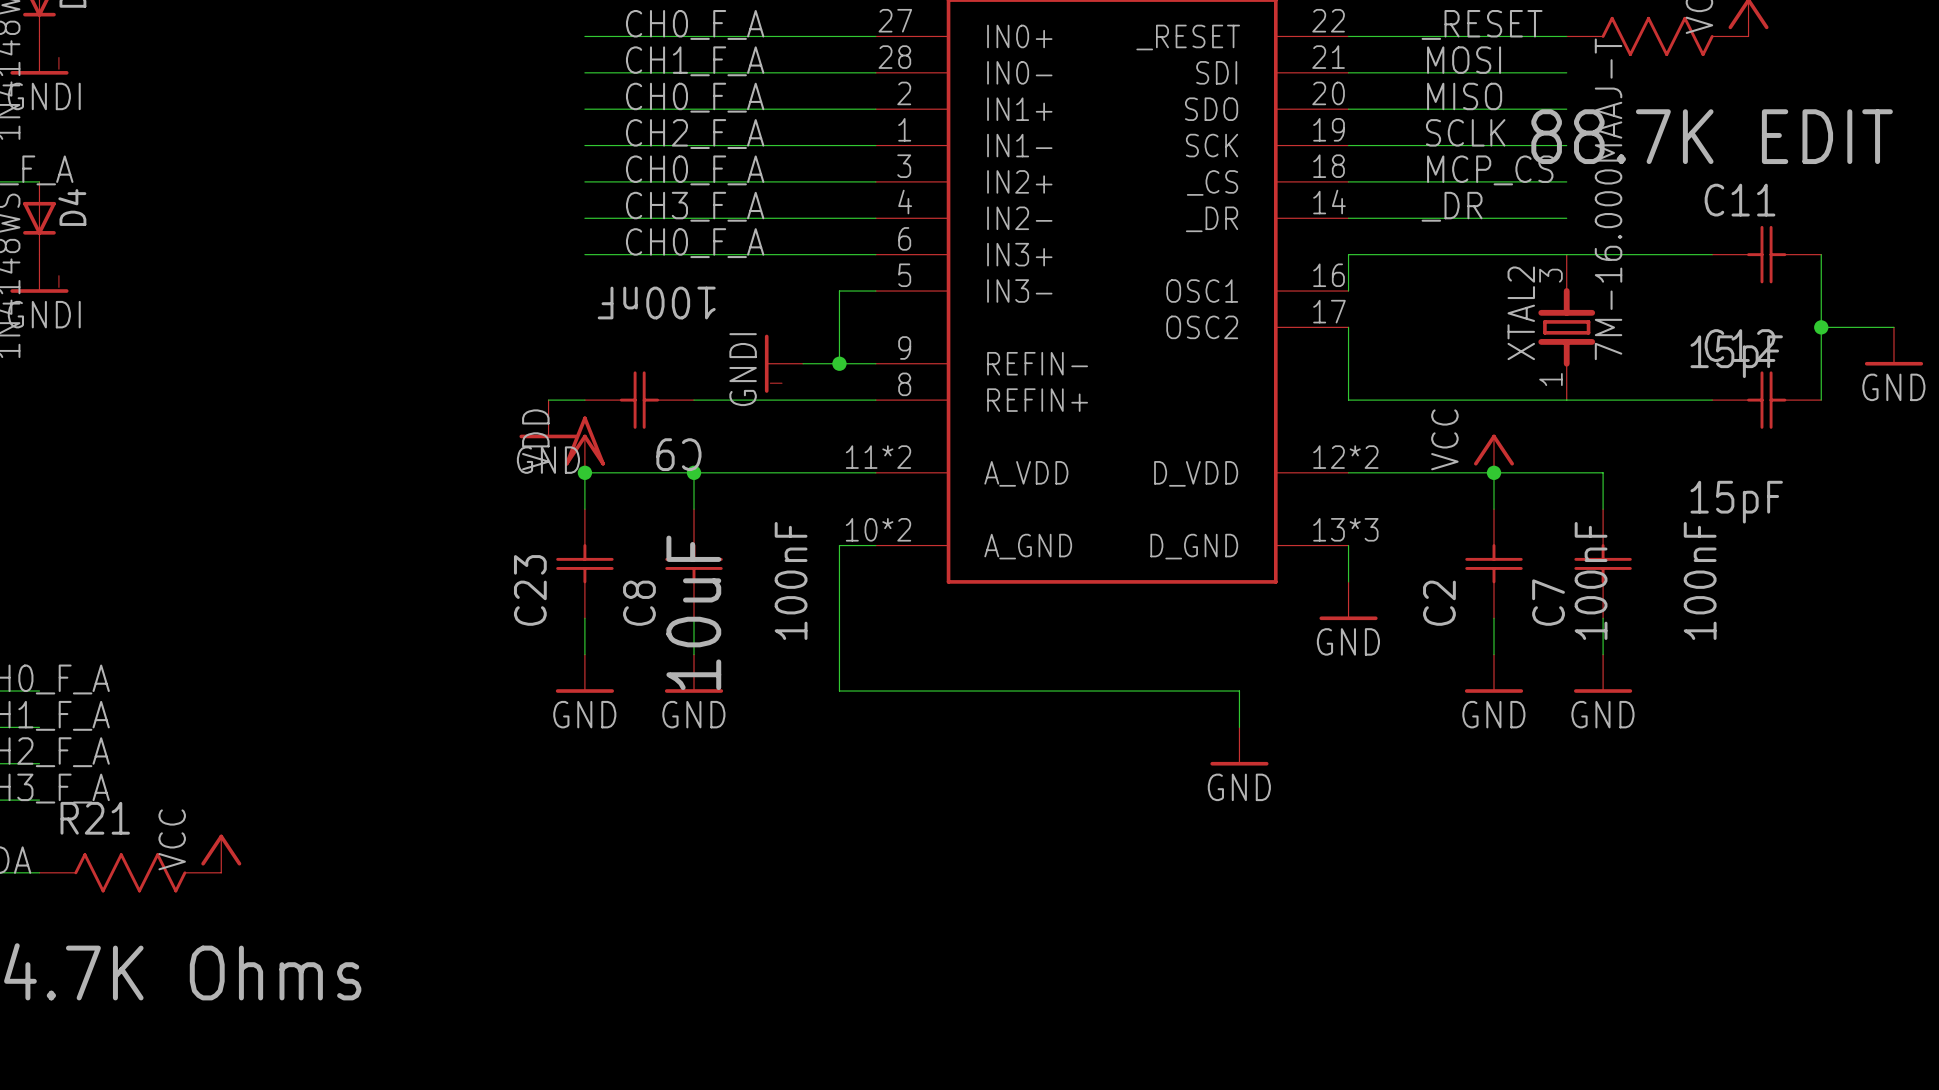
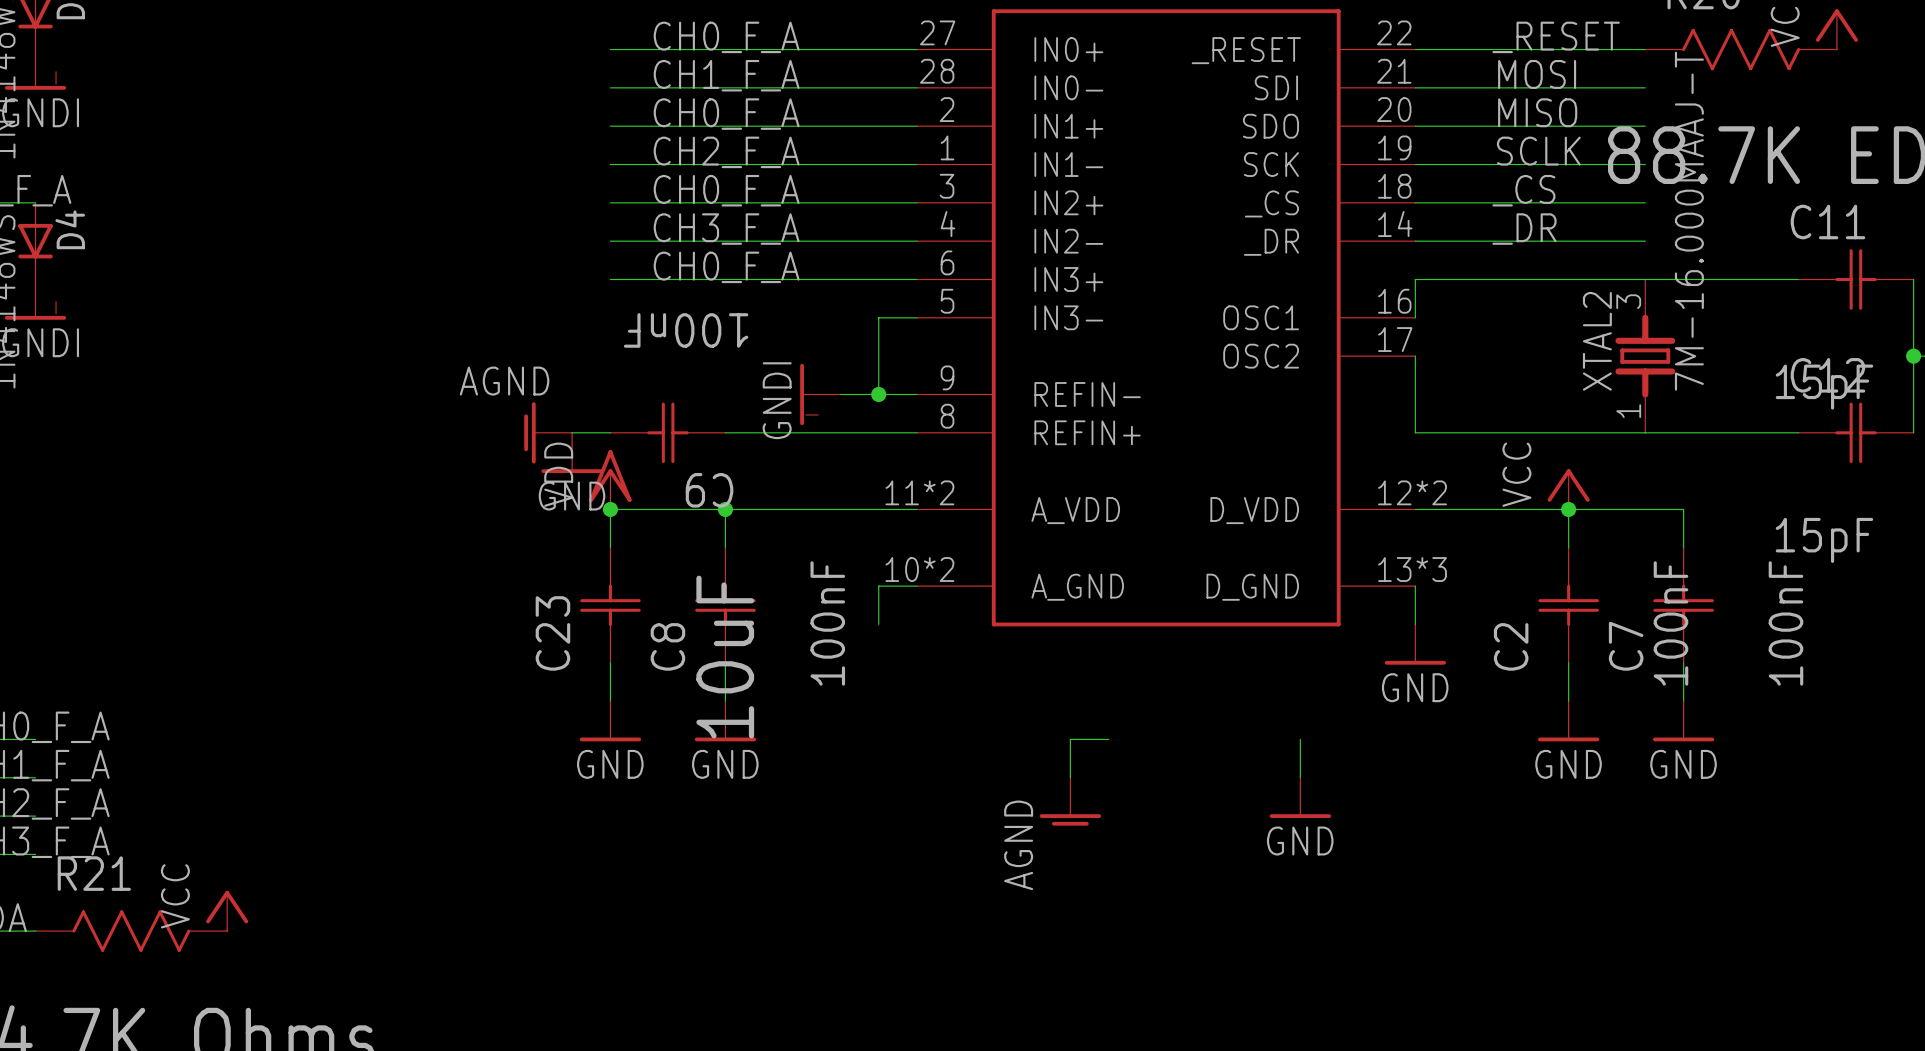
label: MCP_CS (1490, 170) -> _CS (1523, 190)
power symbol: none -> AGND (548, 432)
wire: (839, 581) (839, 691) (1021, 691) -> (1070, 777) (1070, 739)
wire: (1057, 691) (1239, 691) -> none
power symbol: none -> AGND (1070, 801)

